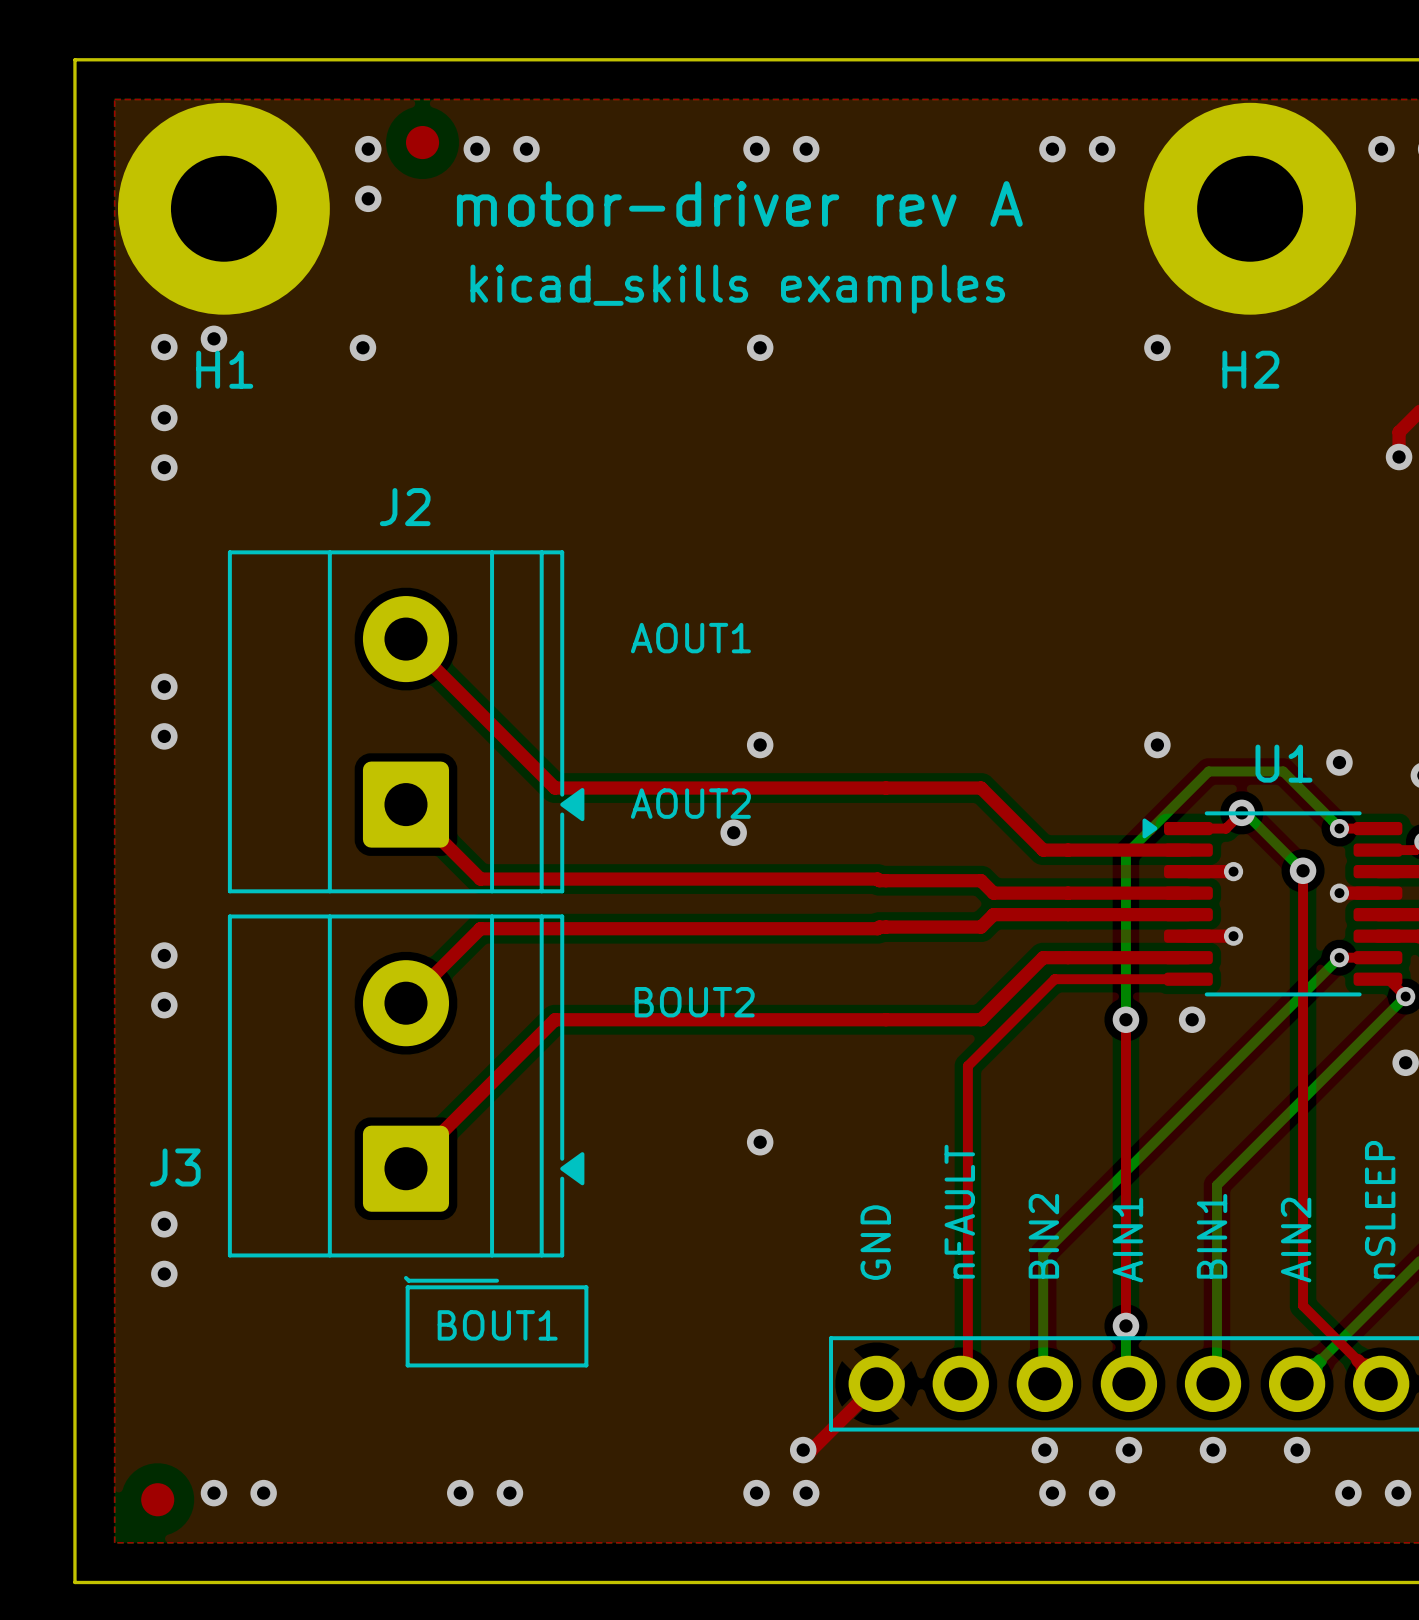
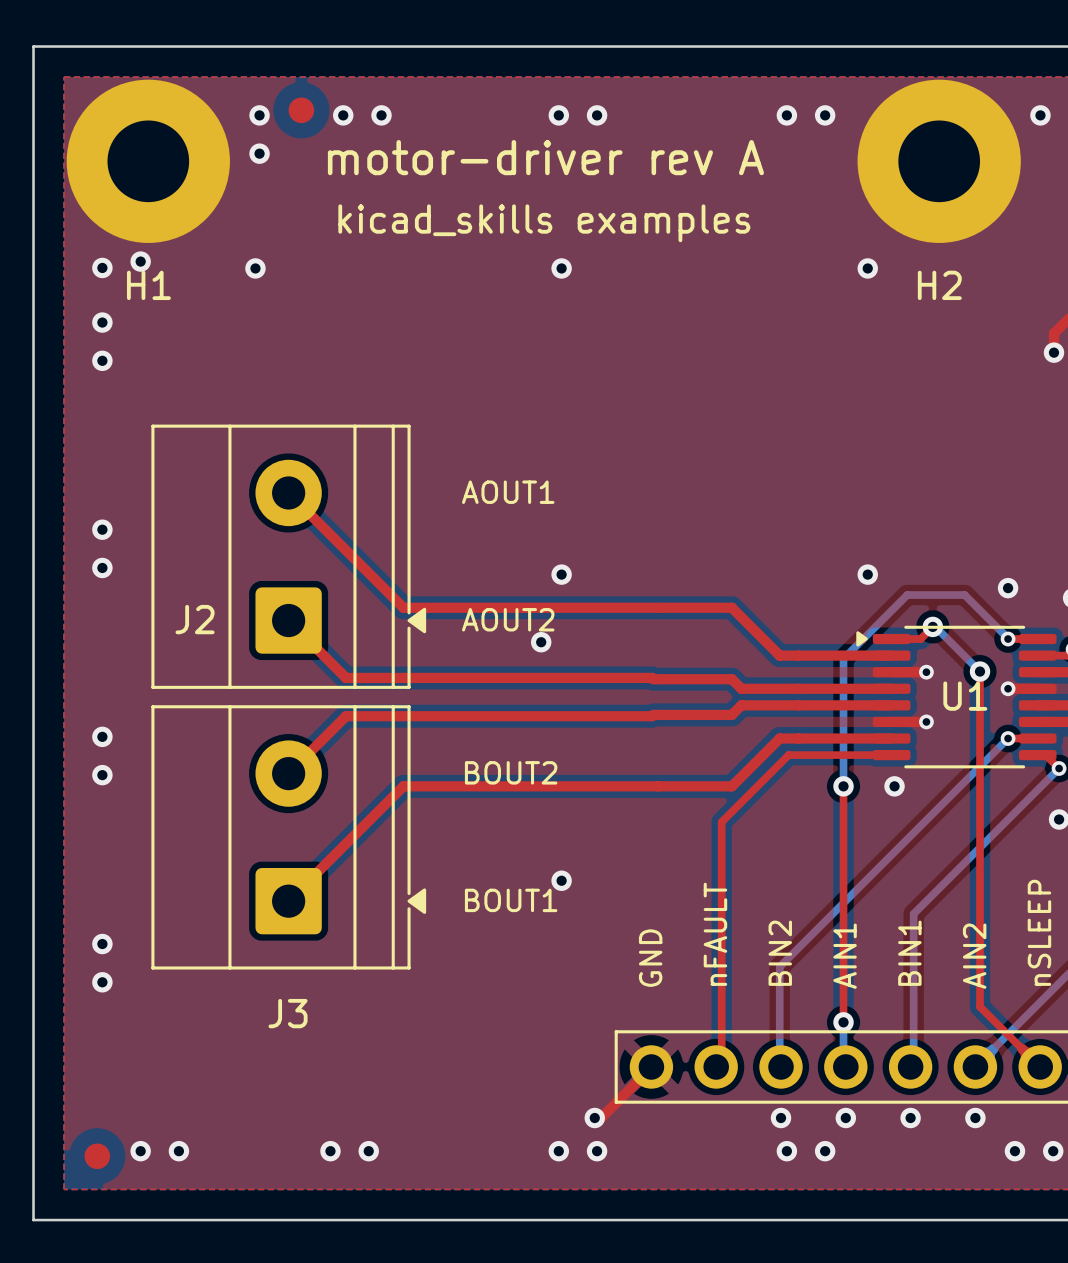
J2 name position: J2 (405, 507) -> J2 (195, 619)
U1 name position: U1 (1283, 763) -> U1 (965, 696)
J3 name position: J3 (175, 1167) -> J3 (288, 1013)
line: (405, 1277) (408, 1280) (497, 1280) -> none
line: (407, 1287) (586, 1287) (586, 1365) (407, 1365) (407, 1287) -> none
text position: BOUT1 (497, 1325) -> BOUT1 (511, 900)

